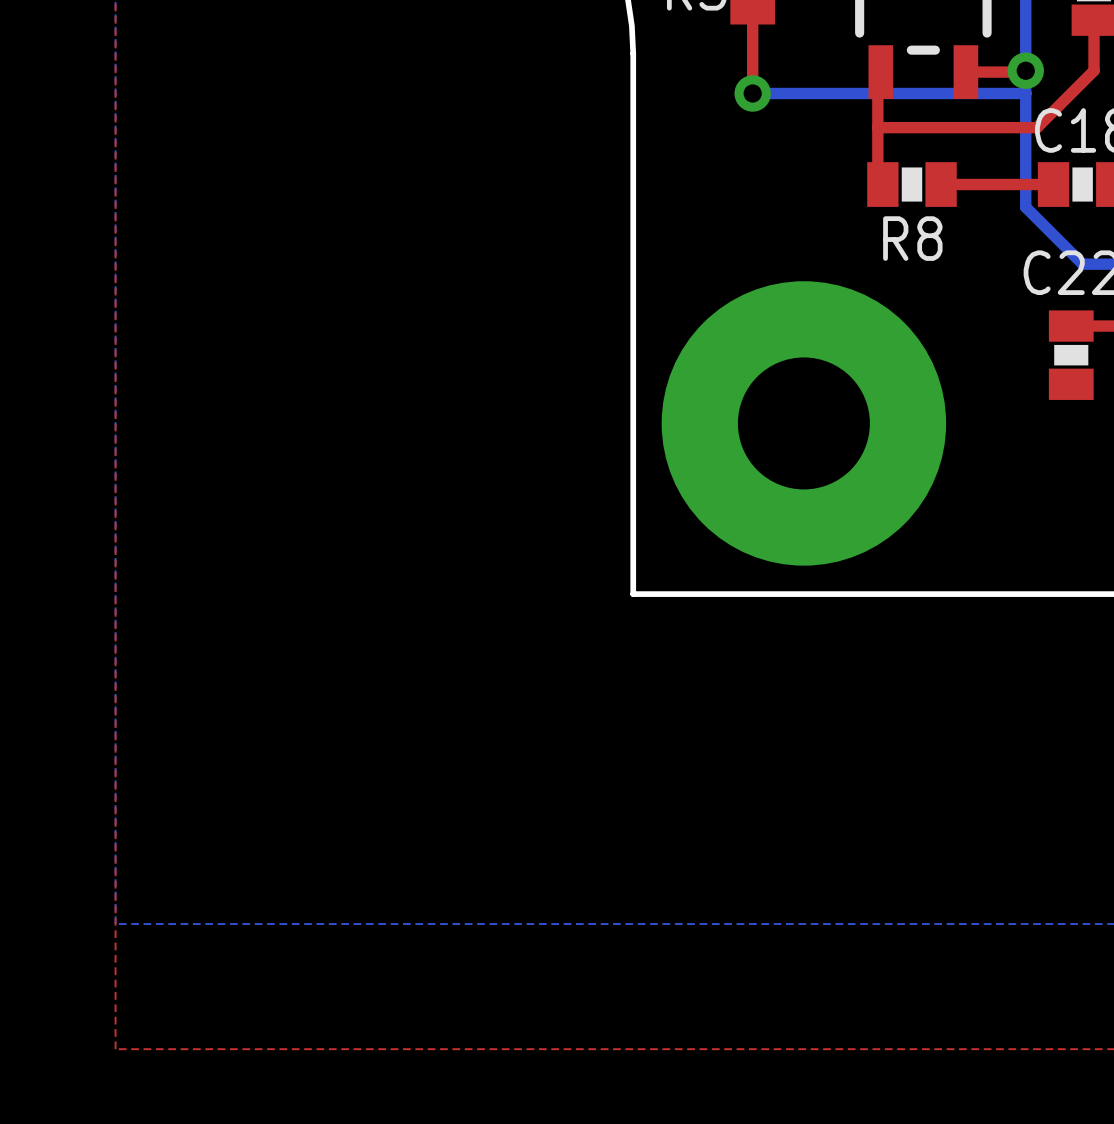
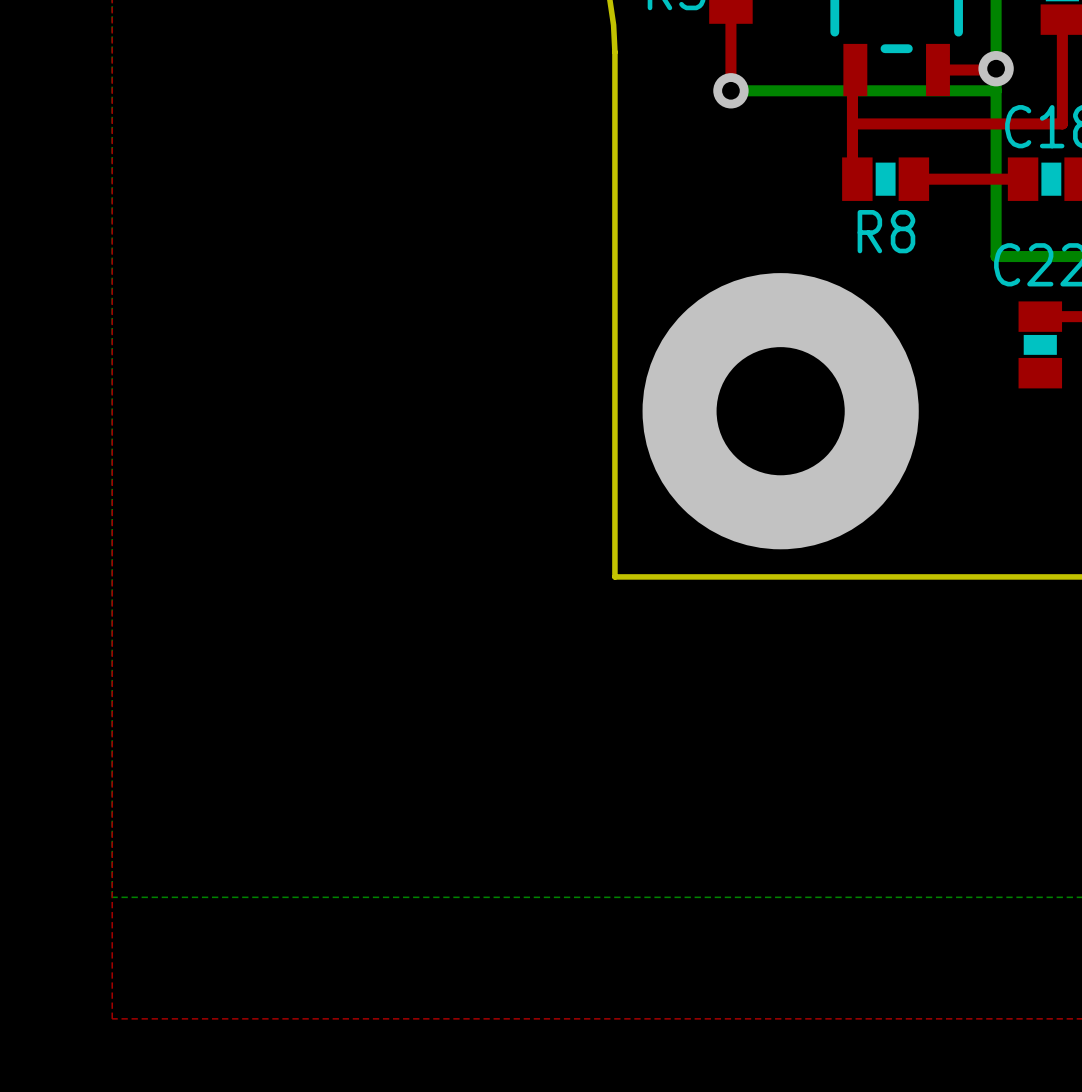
top track: (1094, 70) (1037, 127) -> (1062, 68) (1062, 123) (1007, 123)
bottom track: (1025, 207) (1082, 264) -> (996, 201) (996, 256) (1051, 256)

